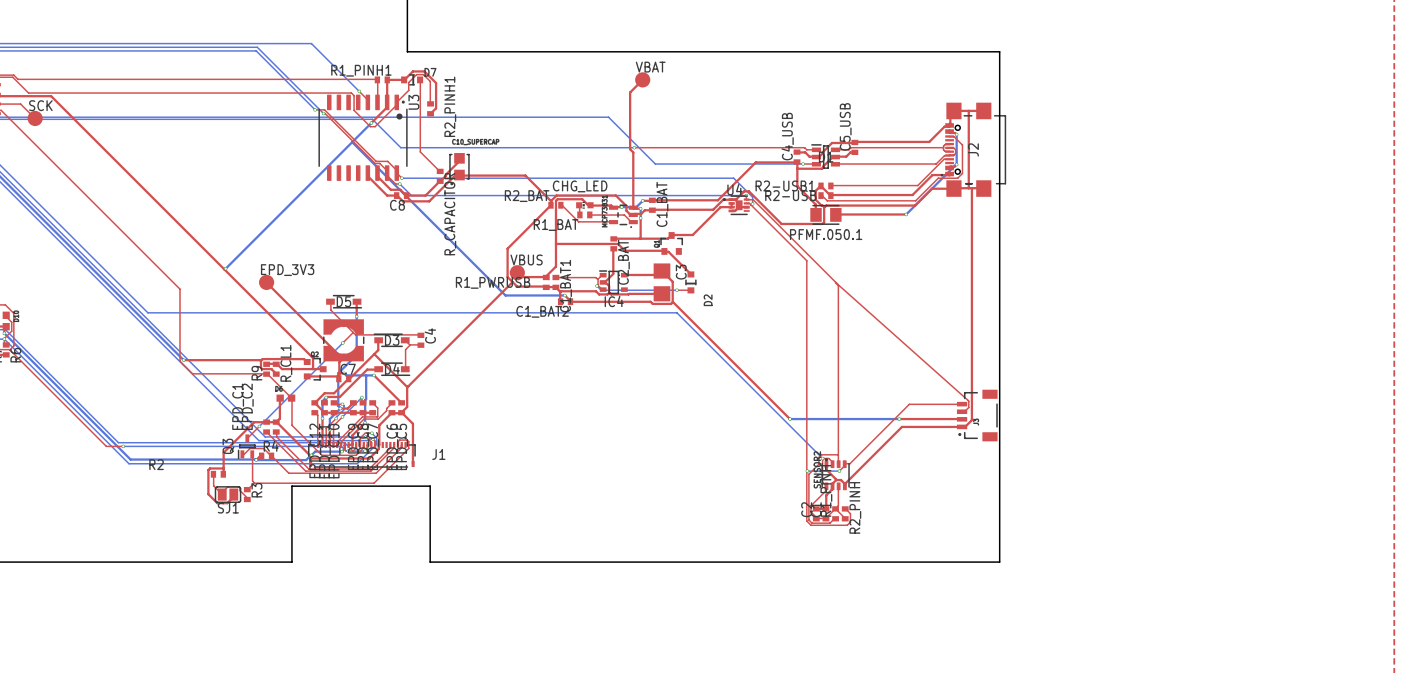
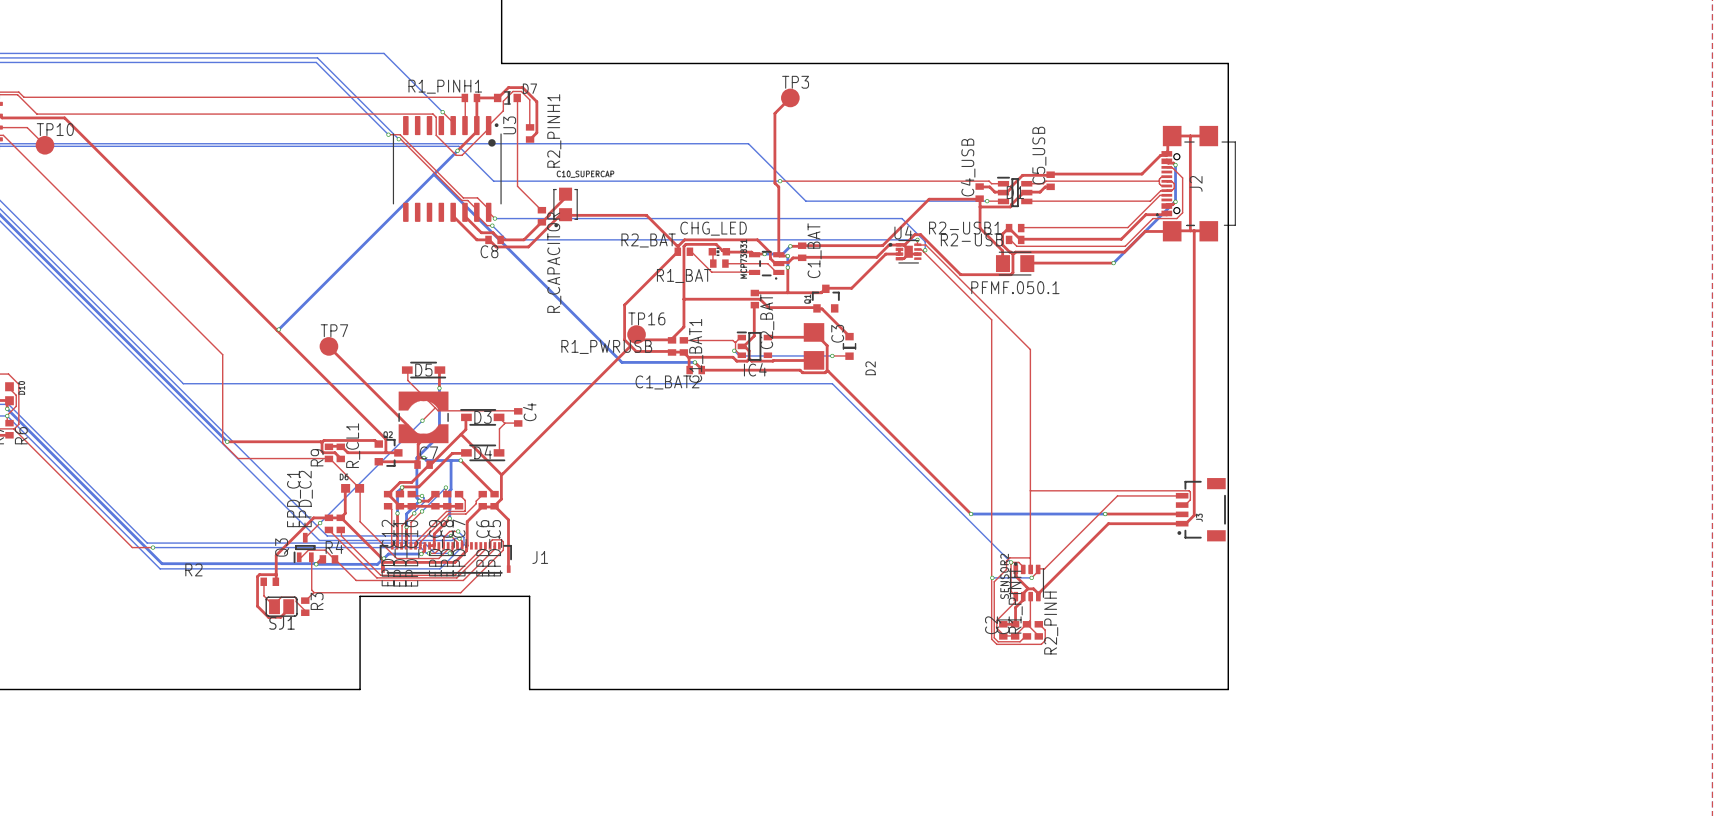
VBAT name: VBAT (650, 67) -> TP3 (795, 82)
SCK name: SCK (40, 105) -> TP10 (55, 129)
VBUS name: VBUS (526, 259) -> TP16 (646, 318)
EPD_3V3 name: EPD_3V3 (287, 270) -> TP7 (334, 330)
top track: (838, 285) (835, 282) (967, 400) -> (1030, 490) (1189, 490)

